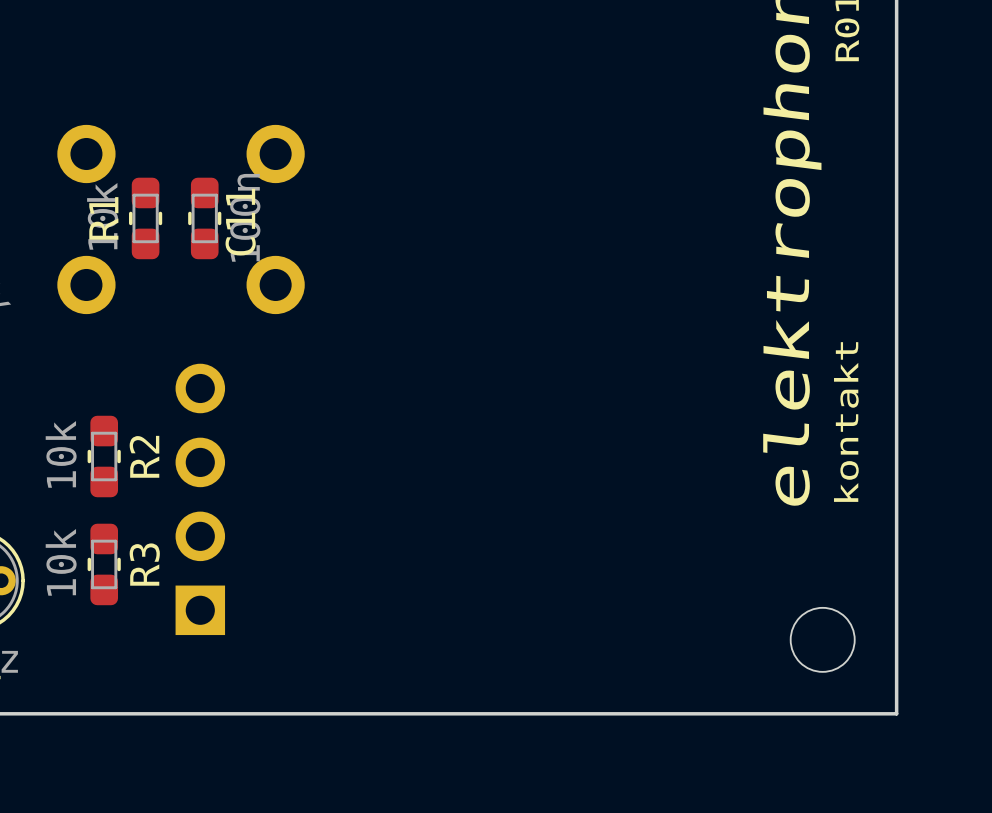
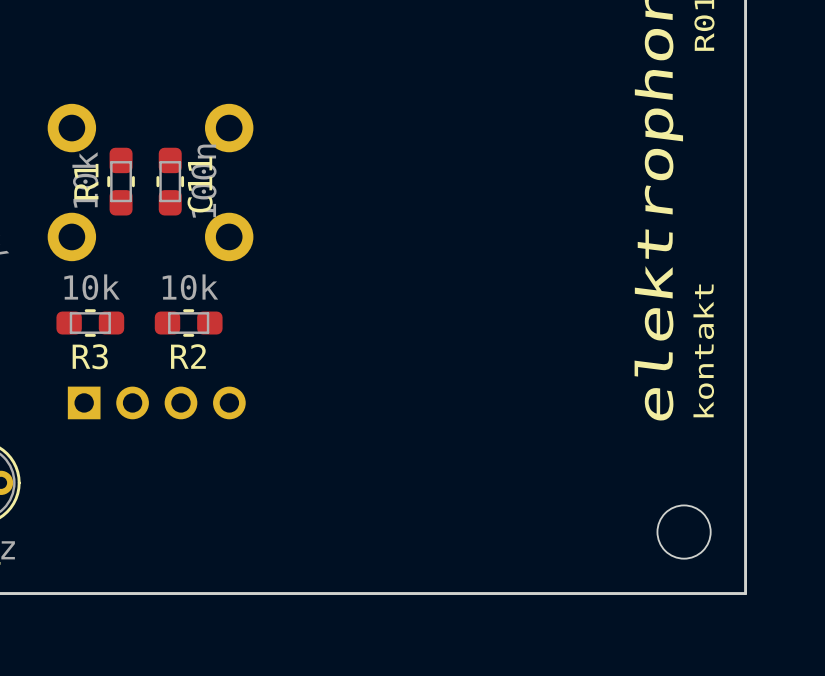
part footprint: [175, 363, 226, 636] -> [67, 386, 246, 420]
R2 rotation: 0° (104, 456) -> 90° clockwise (188, 323)
R2 position: (104, 456) -> (188, 323)
R3 rotation: 0° (104, 564) -> 90° clockwise (90, 323)
R3 position: (104, 564) -> (90, 323)

